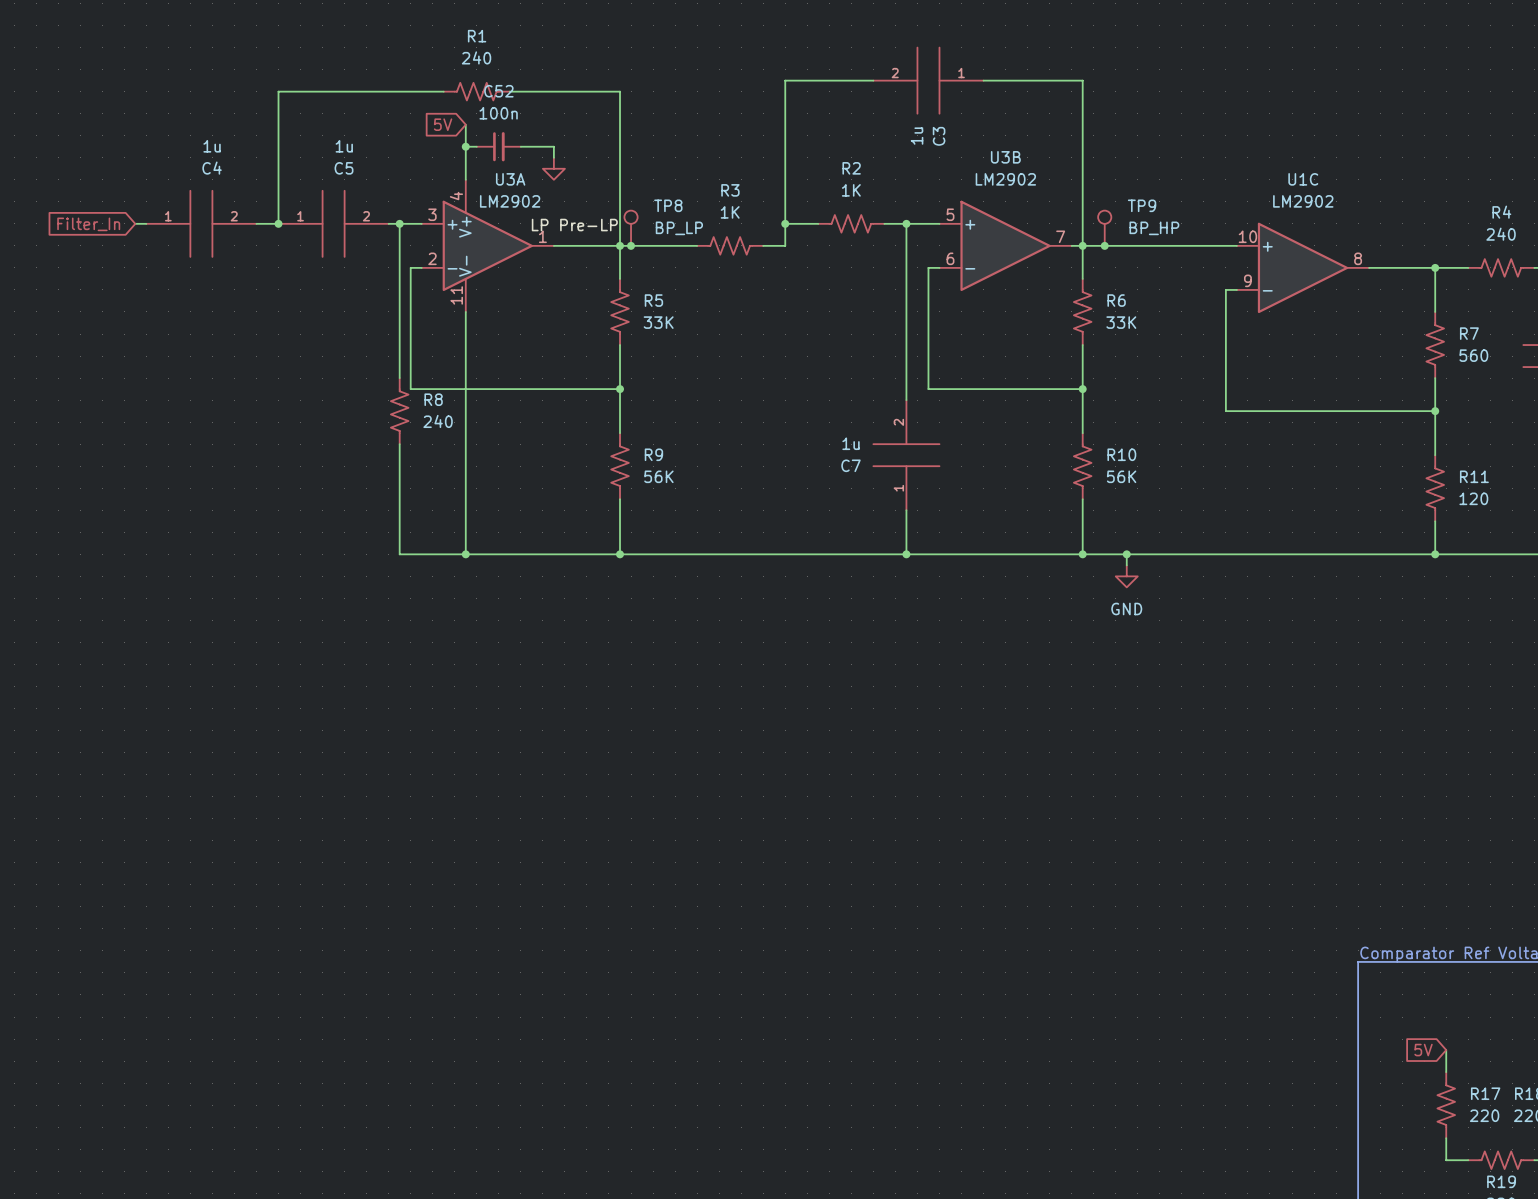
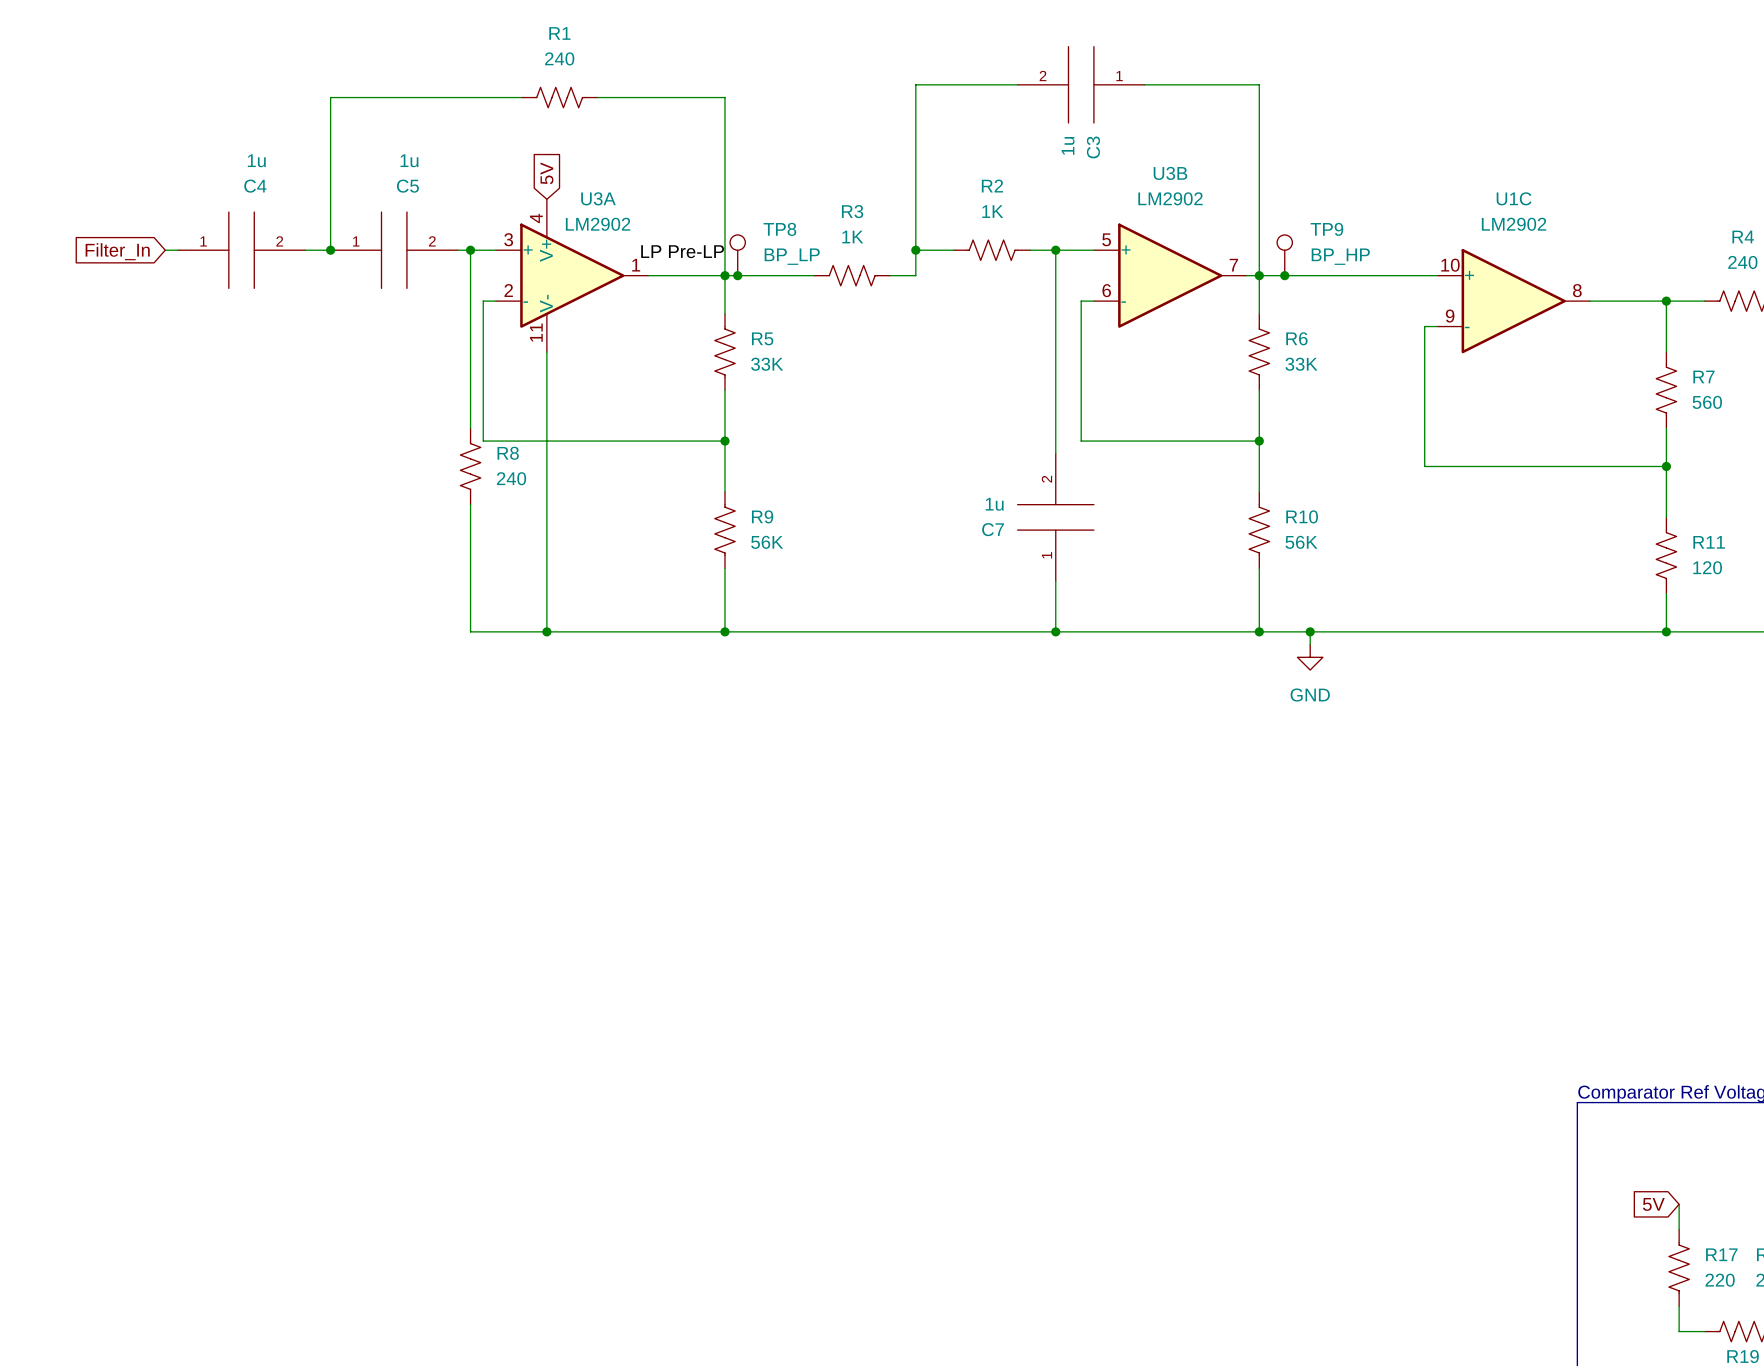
global label rotation: 0° (443, 124) -> 90° clockwise (546, 173)
wire: (465, 124) (465, 179) -> none
wire: (465, 146) (476, 146) -> none
junction: (465, 146) -> none
C52: 100n (498, 146) -> none
wire: (520, 146) (553, 146) (553, 157) -> none
power symbol: (553, 168) -> none

